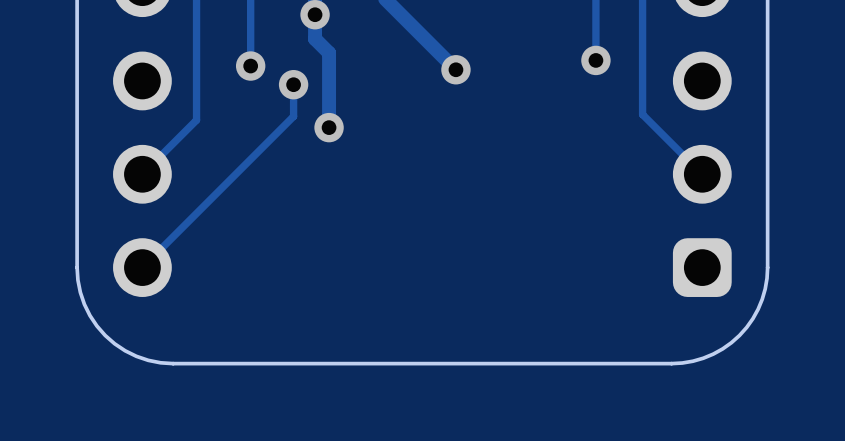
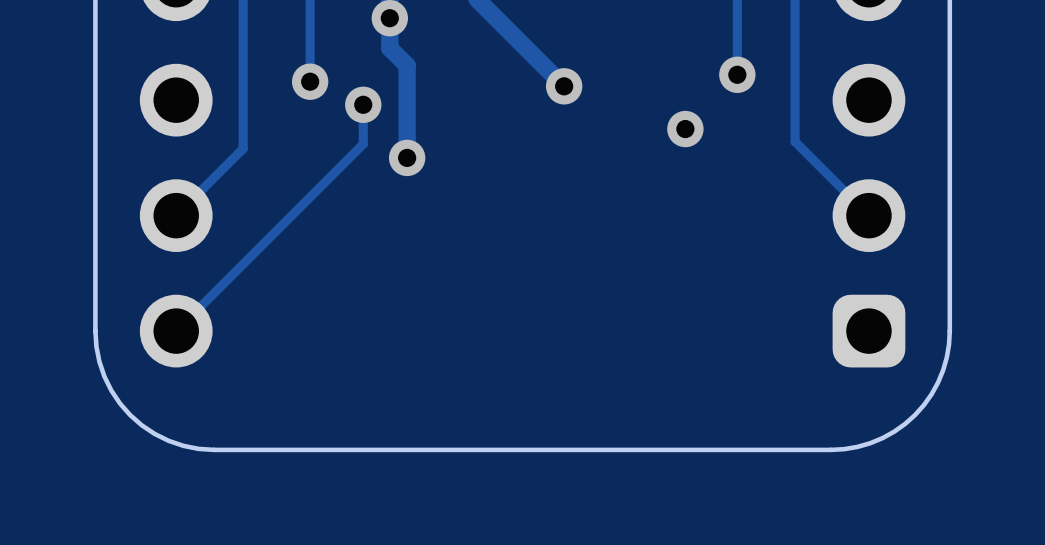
via: none -> (685, 129)

